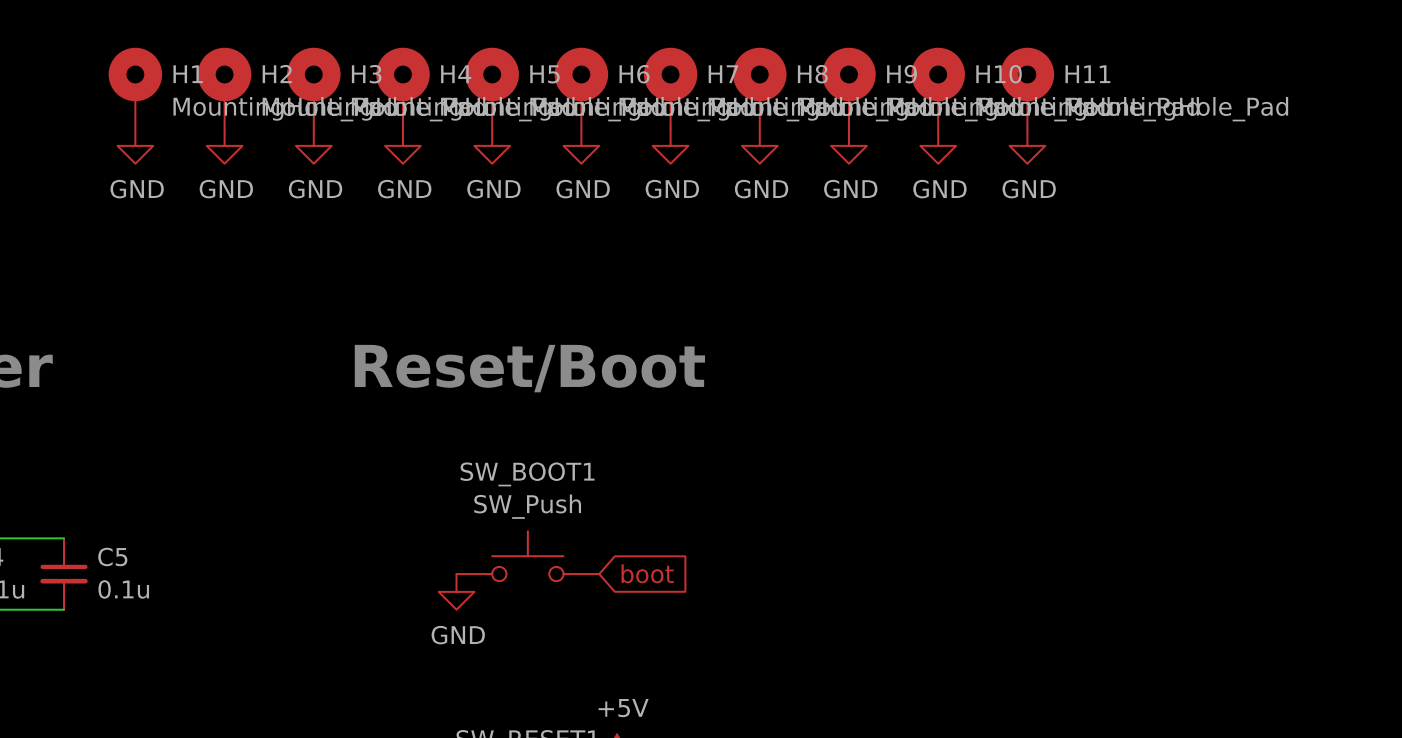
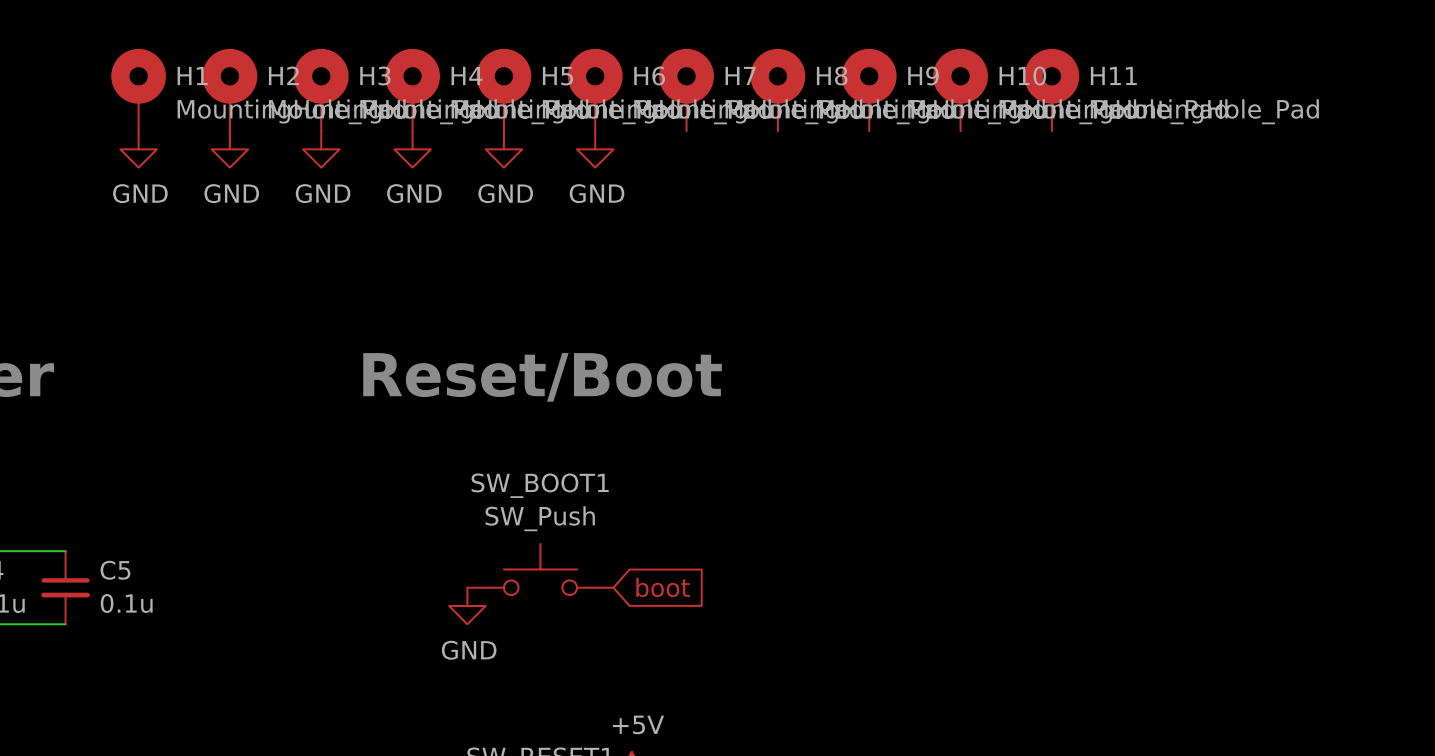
power symbol: GND (670, 145) -> none
power symbol: GND (759, 145) -> none
power symbol: GND (849, 145) -> none
power symbol: GND (938, 145) -> none
power symbol: GND (1027, 145) -> none

